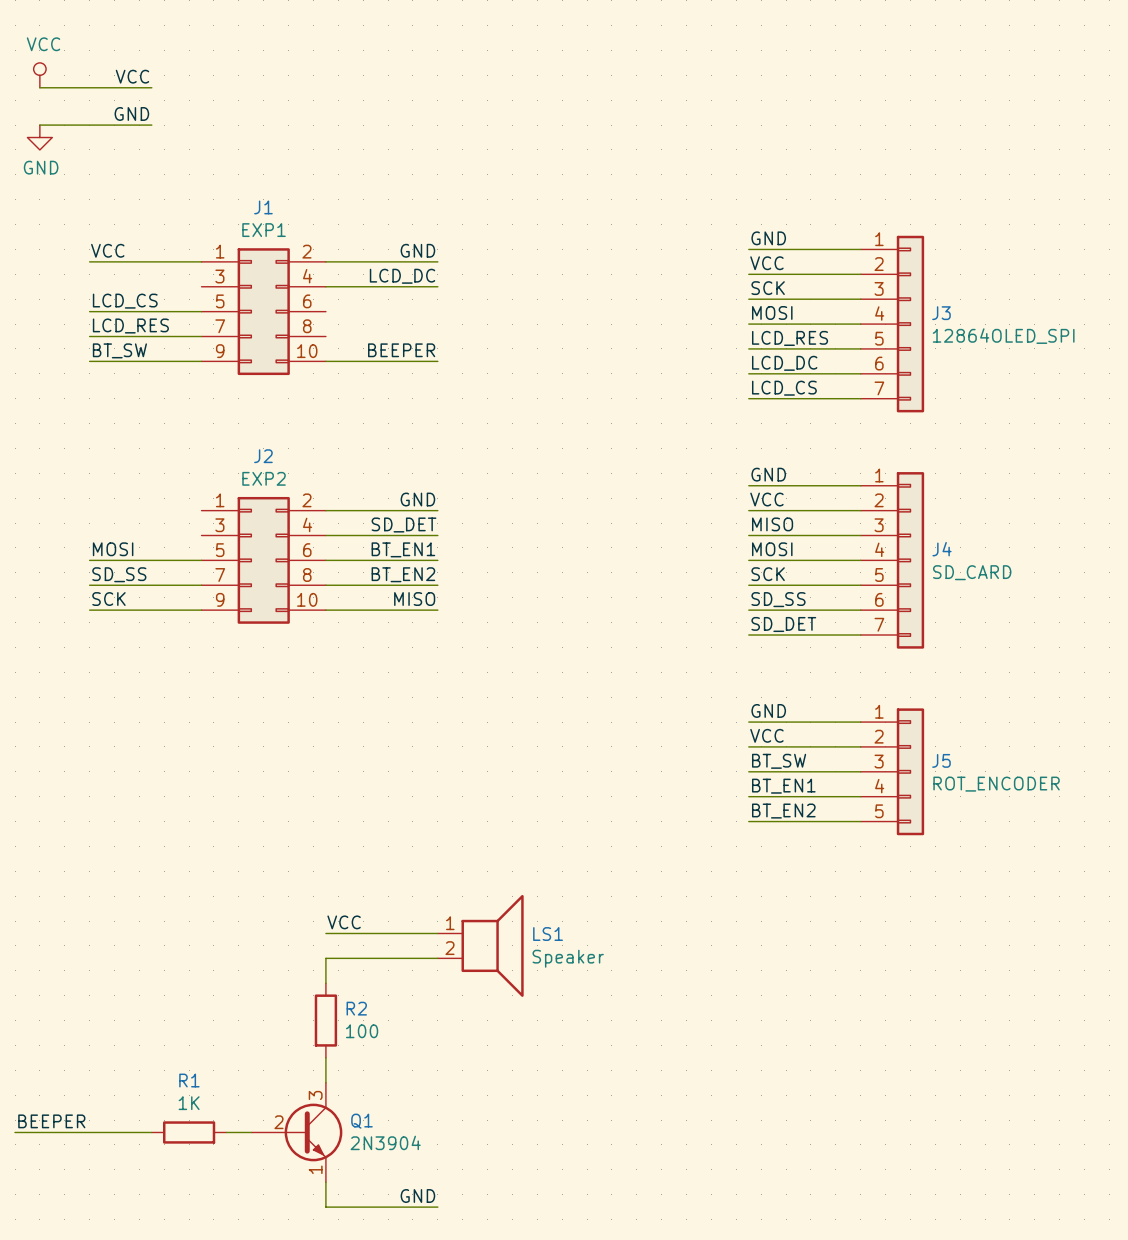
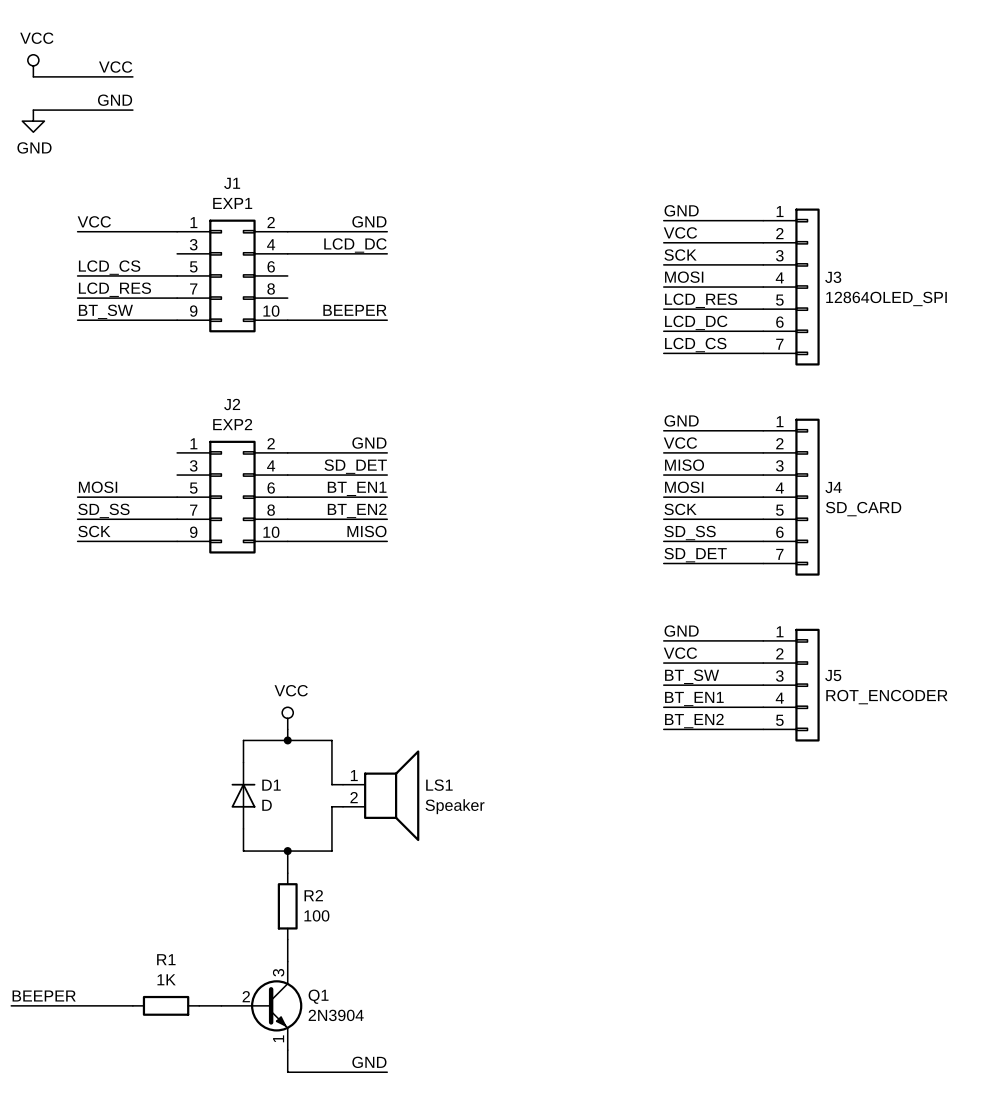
power symbol: none -> VCC (287, 718)
wire: none -> (287, 729) (287, 740)
junction: none -> (287, 740)
wire: none -> (243, 762) (243, 740) (331, 740) (331, 784) (343, 784)
D1: none -> D (243, 795)
label: VCC (344, 922) -> none
wire: none -> (243, 828) (243, 851) (287, 851)
wire: (325, 933) (437, 933) -> none
LS1 position: (480, 945) -> (381, 795)
junction: none -> (287, 851)
wire: (375, 958) (437, 958) -> (331, 851) (331, 806) (343, 806)

